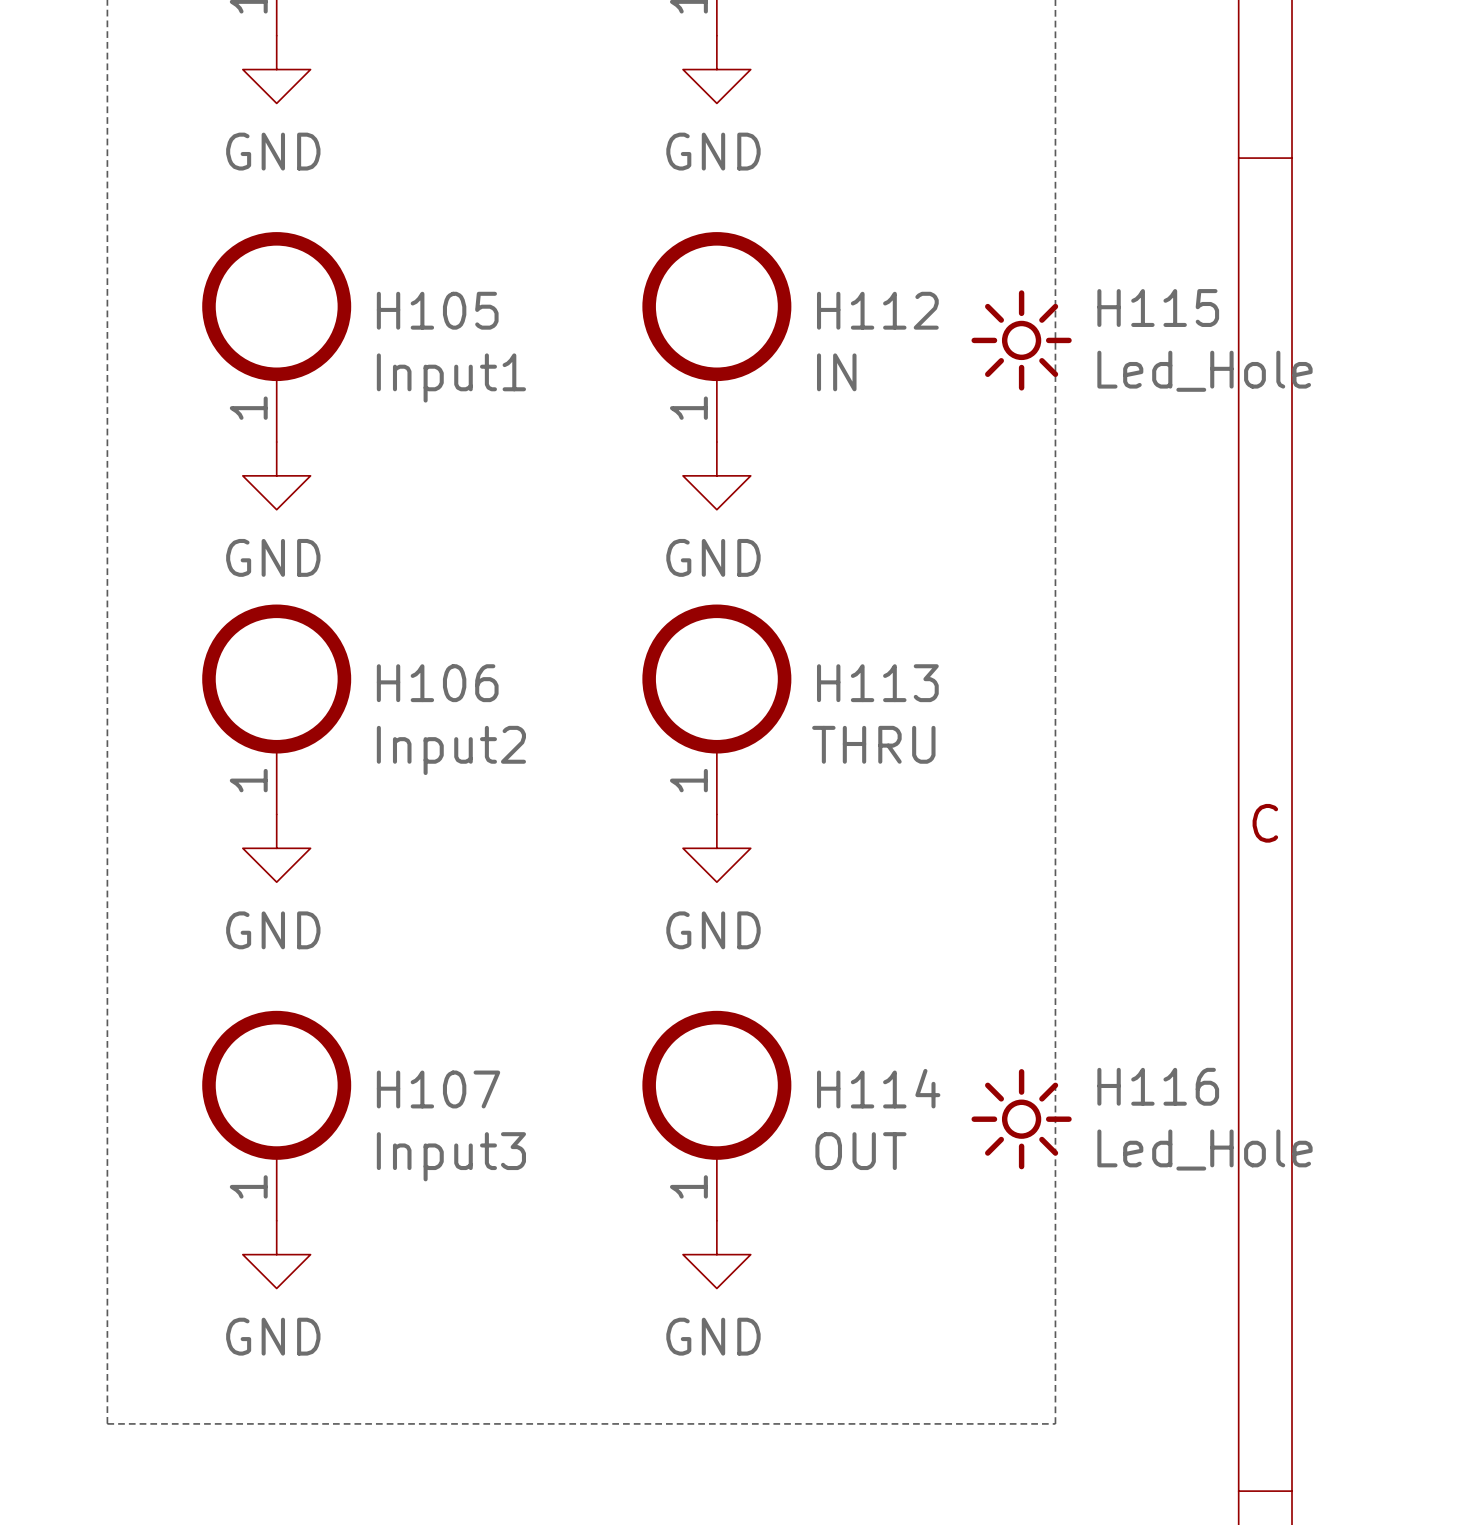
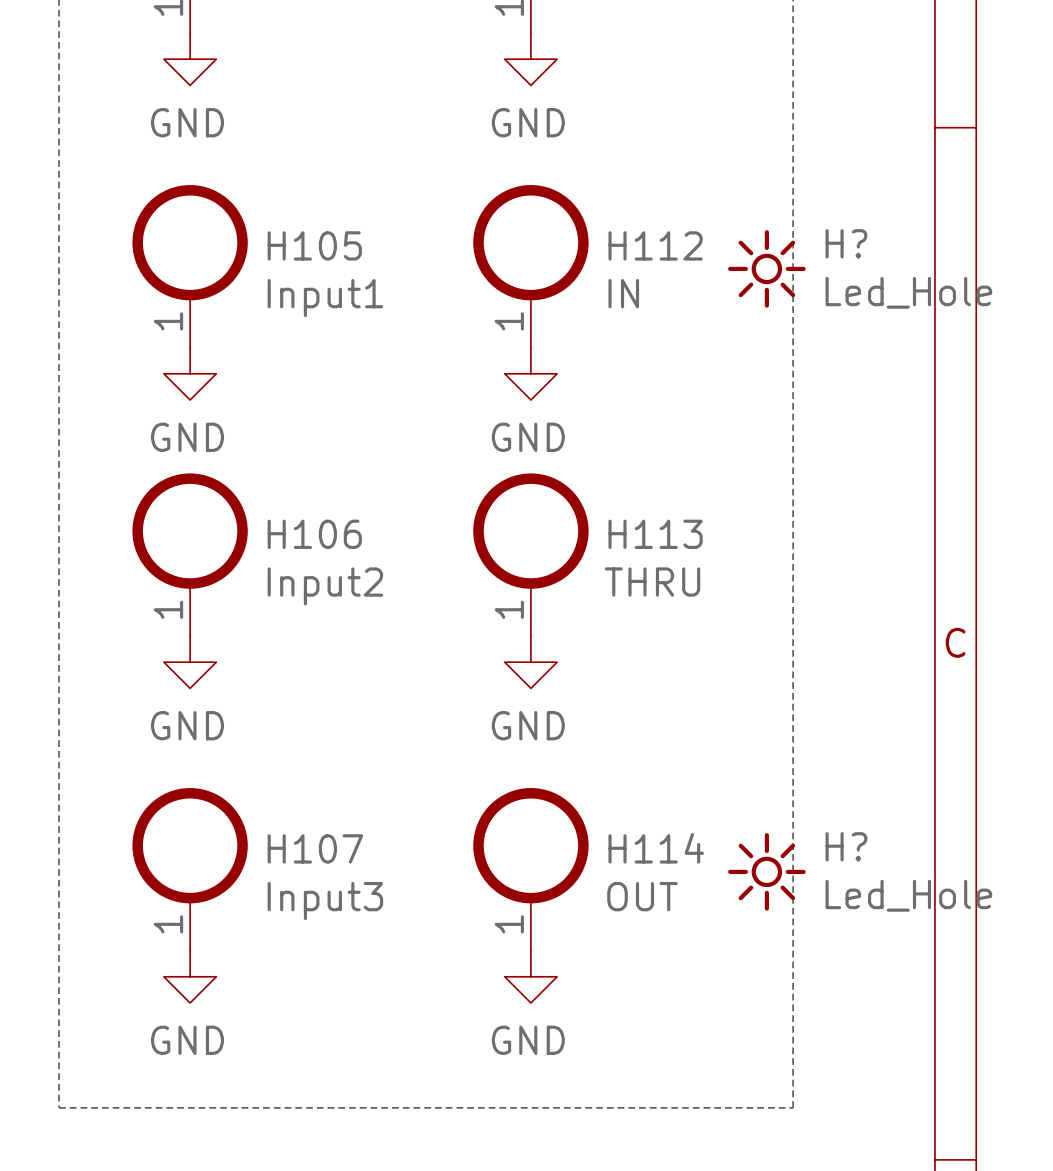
H115 name: H115 (1158, 308) -> H? (846, 243)
H116 name: H116 (1158, 1086) -> H? (846, 846)

